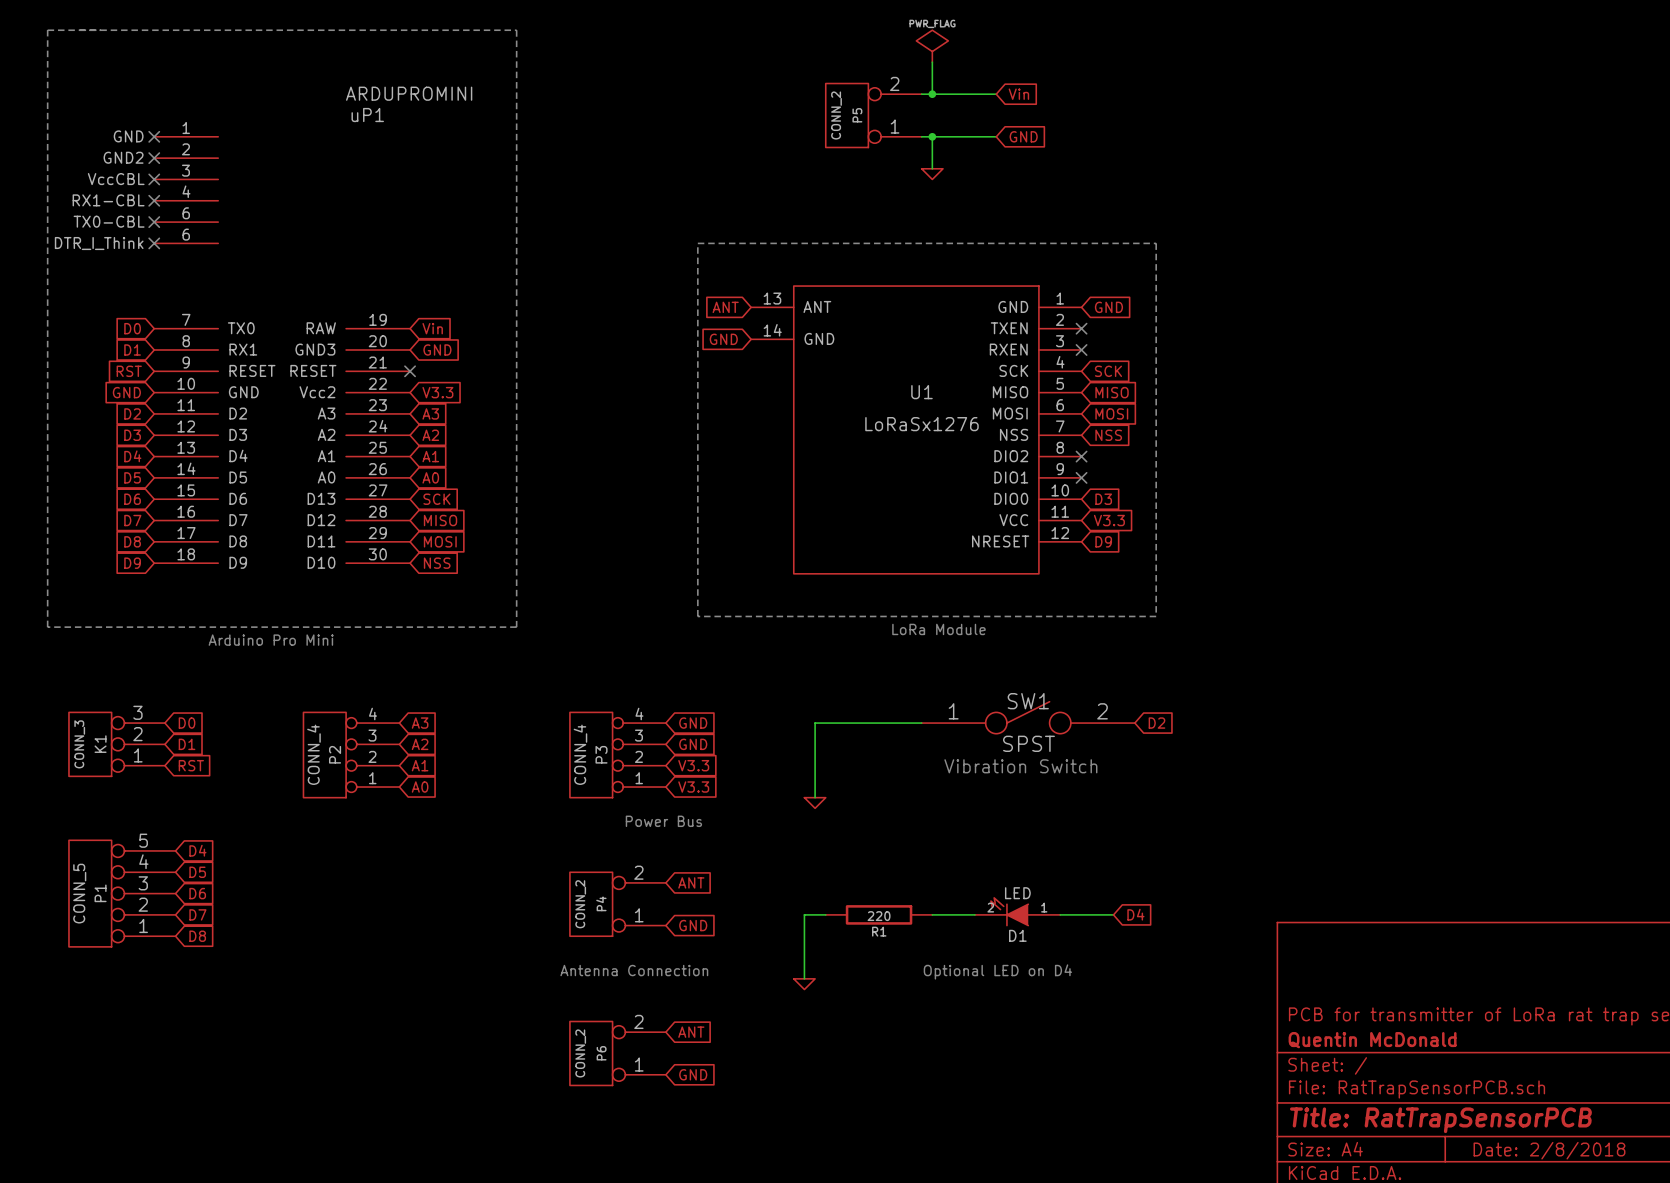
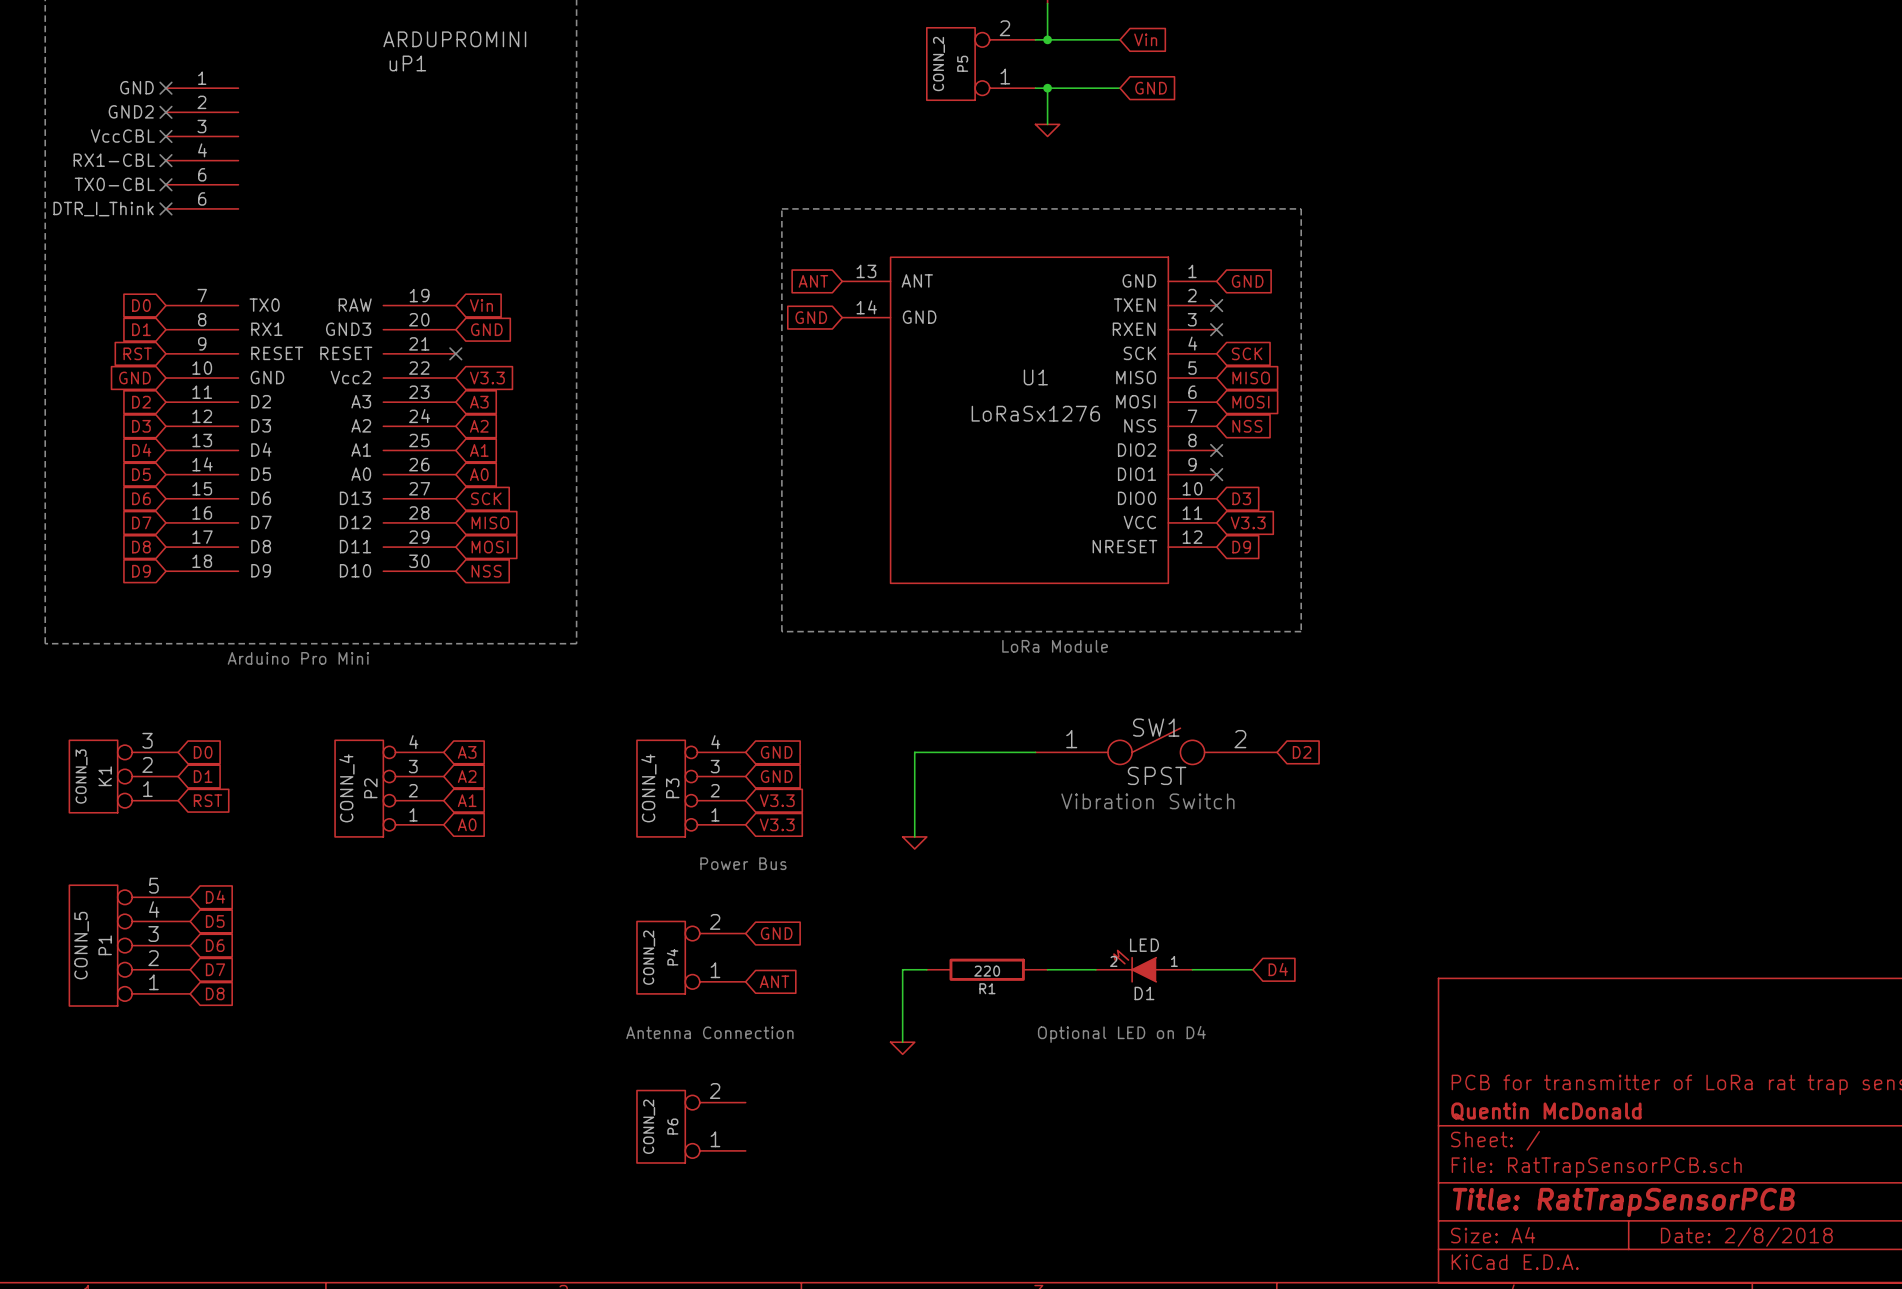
global label: ANT (691, 882) -> GND (776, 933)
global label: GND (693, 925) -> ANT (774, 981)
global label: ANT (691, 1032) -> none
global label: GND (693, 1074) -> none

